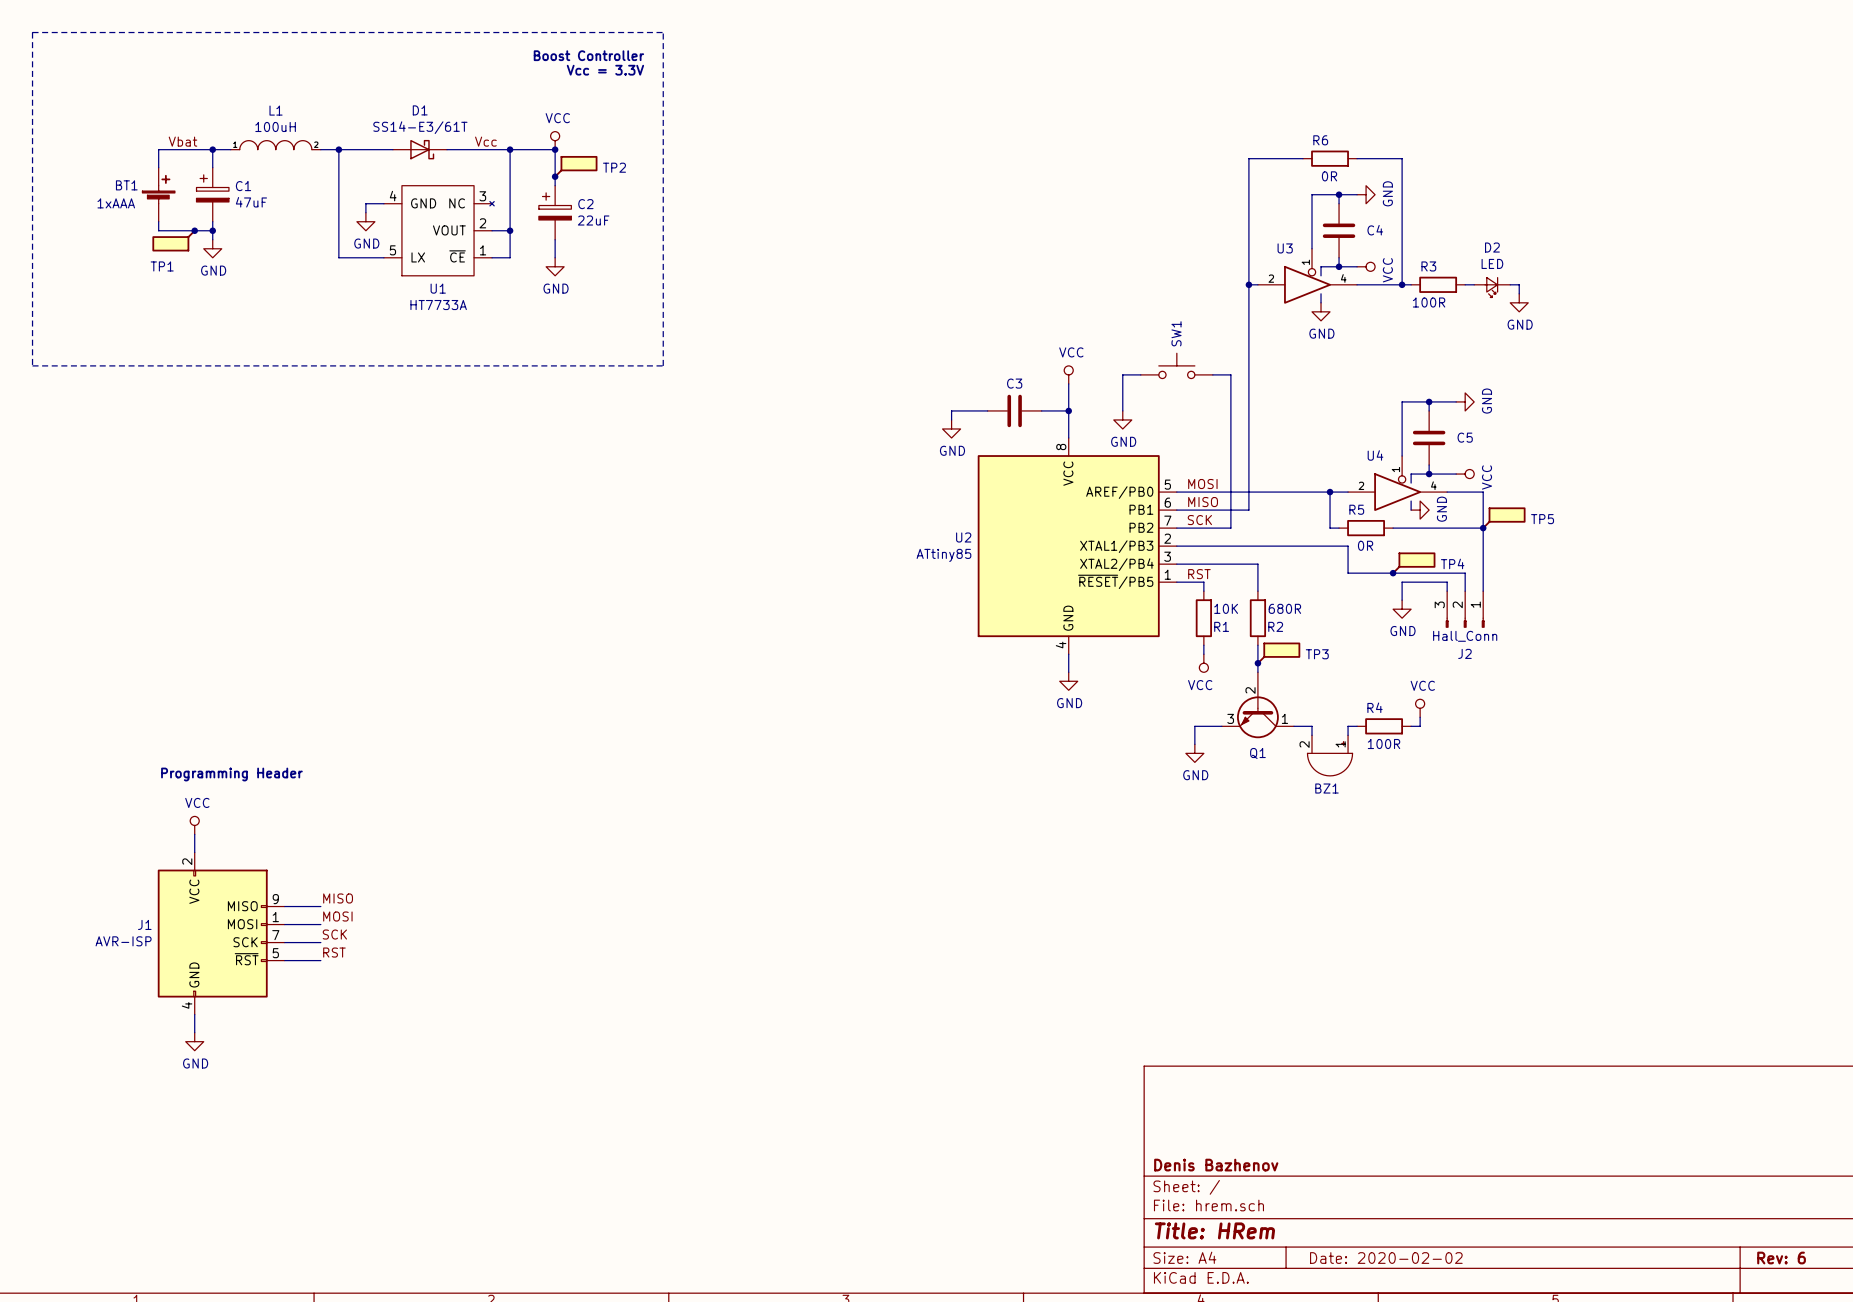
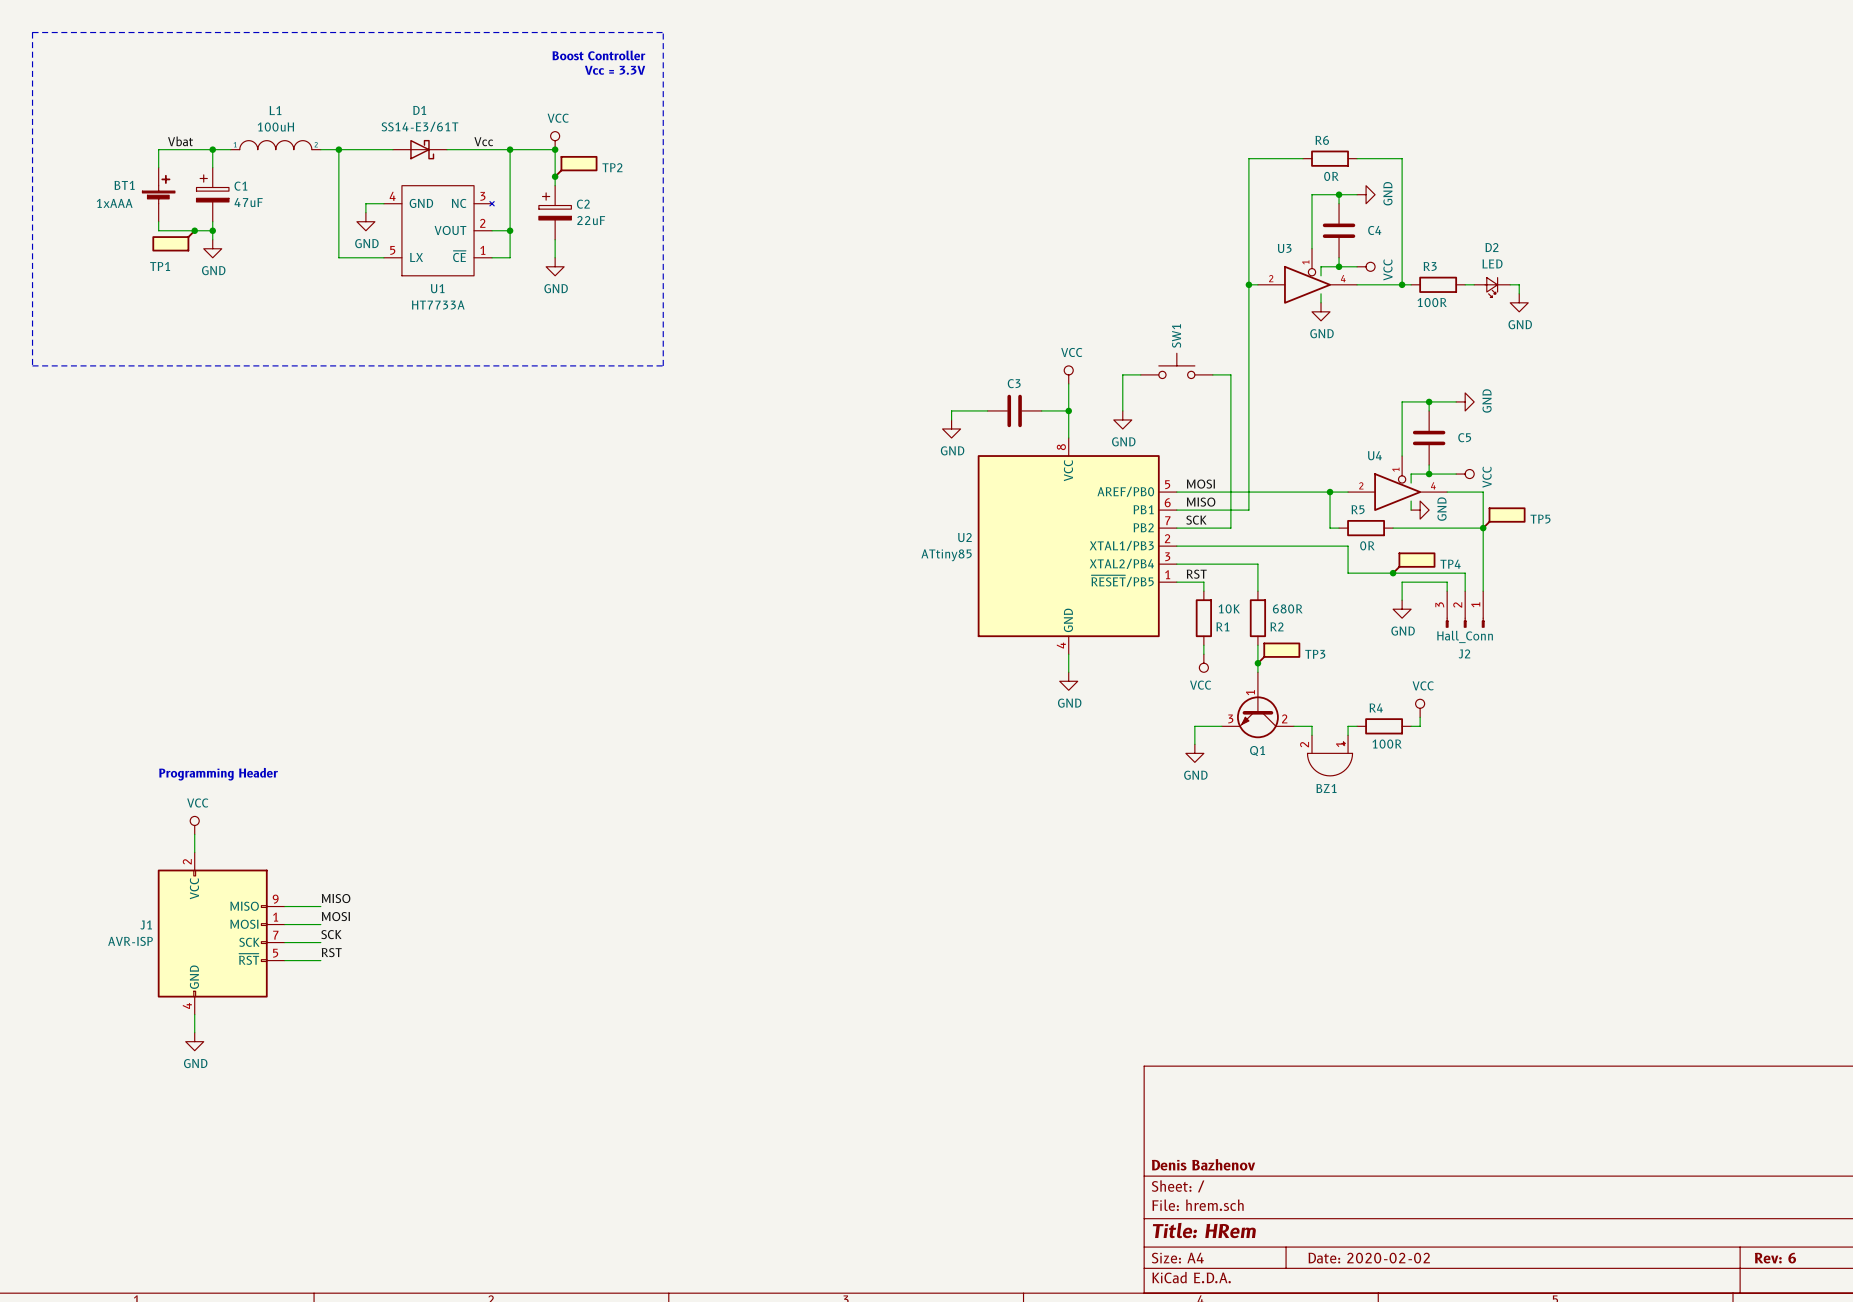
Q1 symbol: [1221, 672, 1294, 739] -> [1221, 672, 1294, 739]

